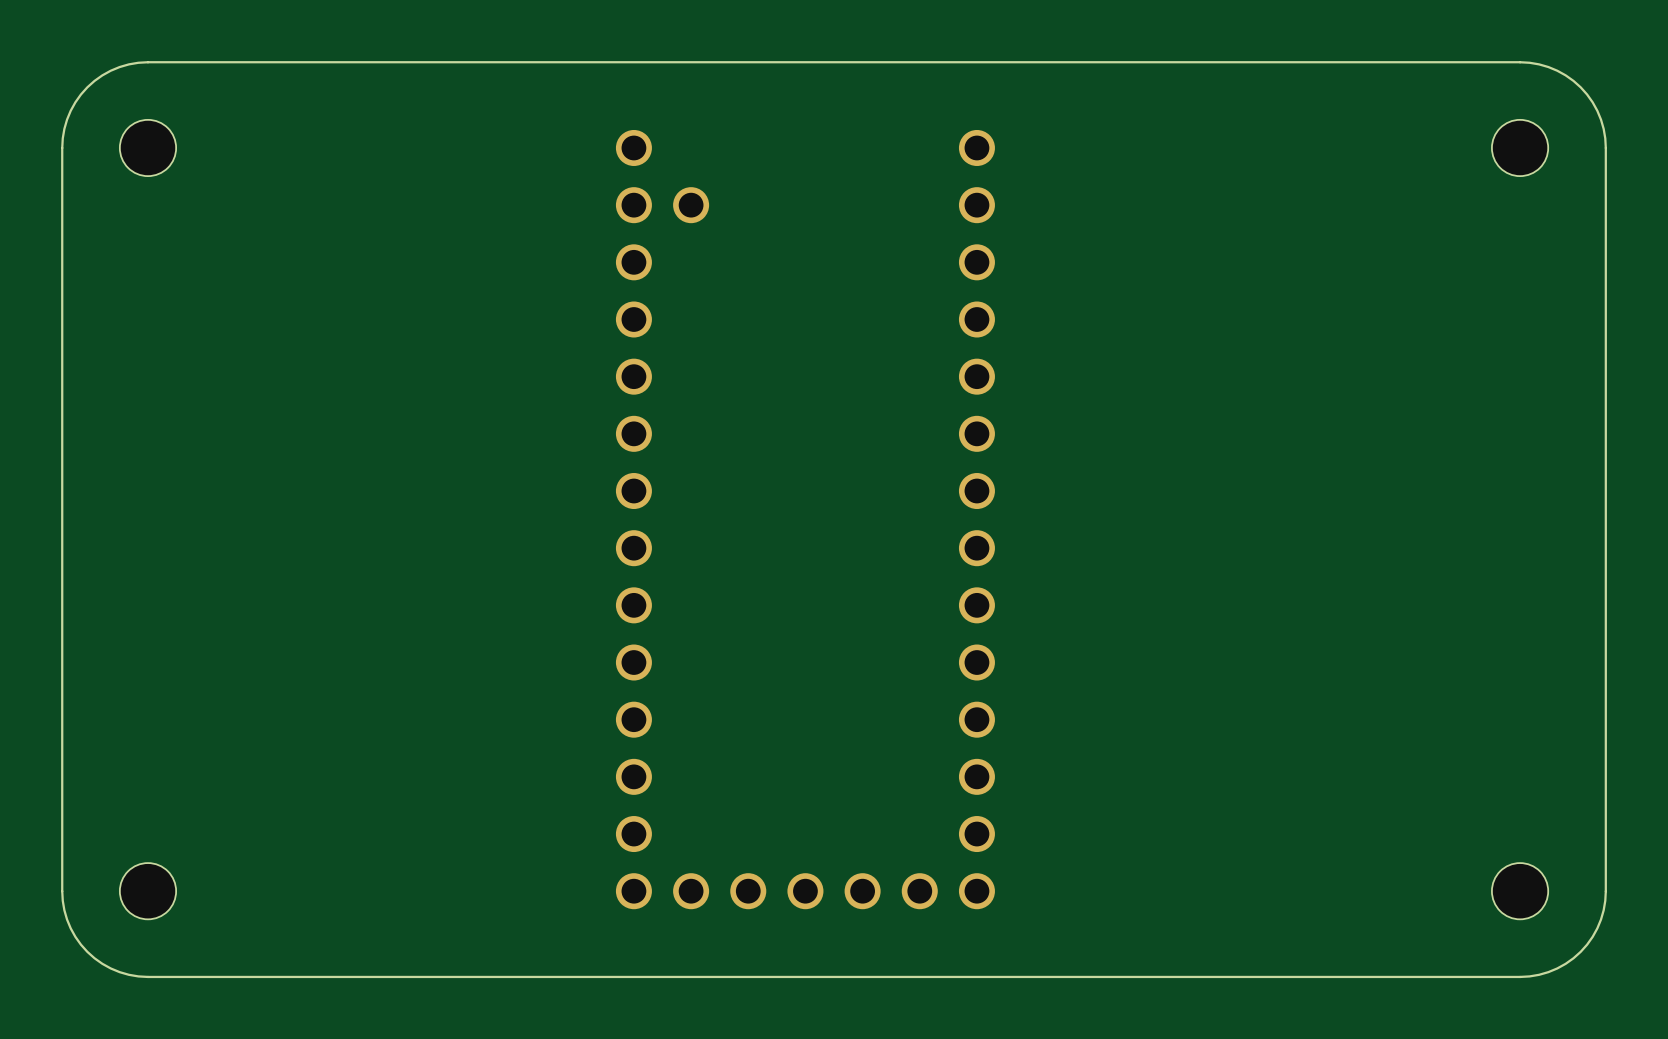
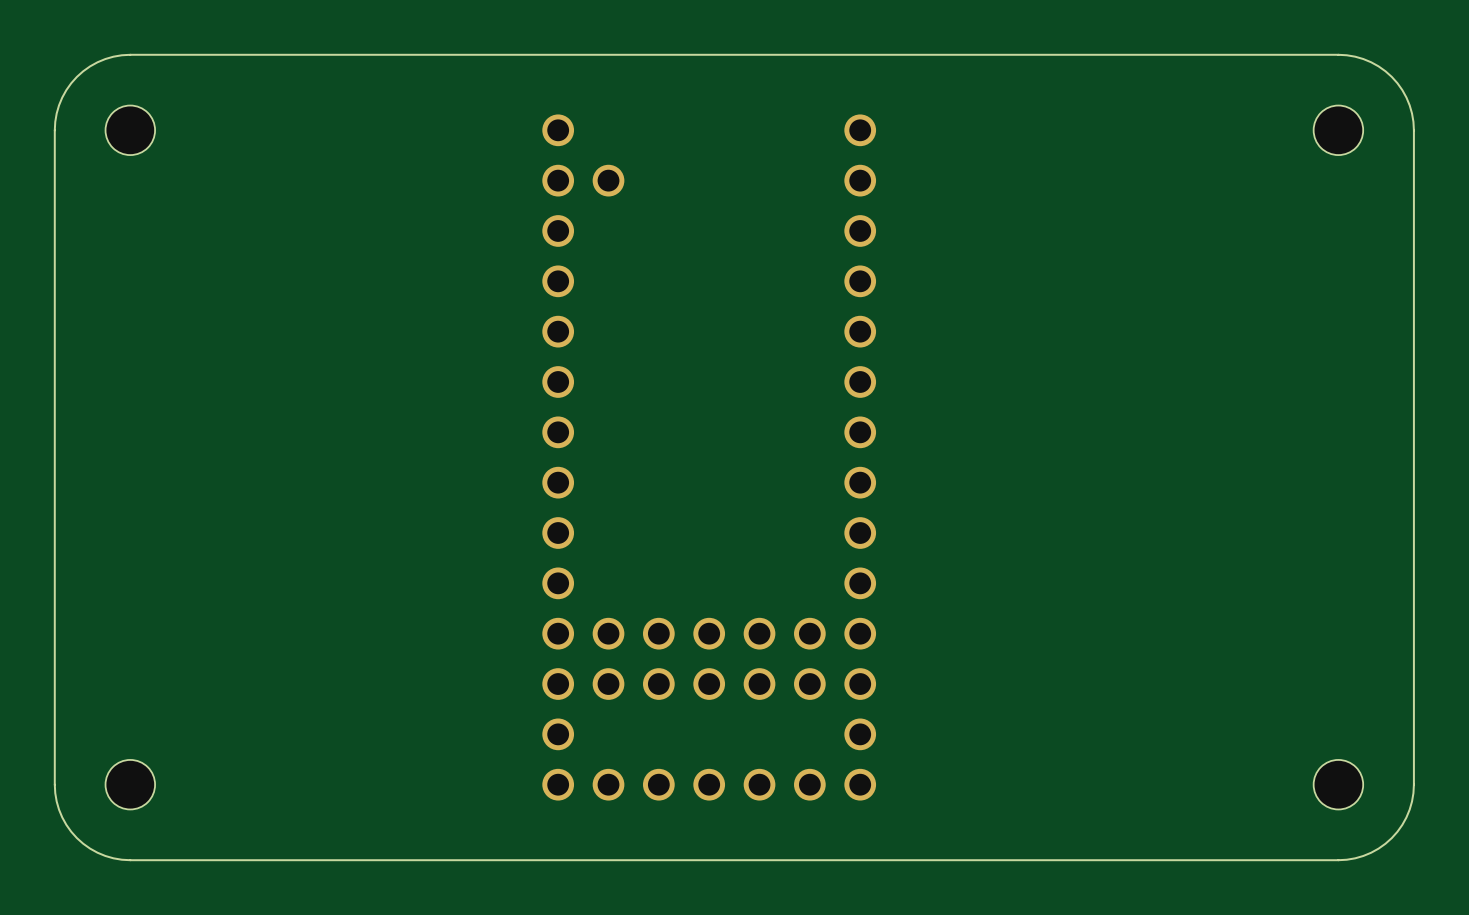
part footprint: [615, 129, 995, 910] -> [542, 114, 877, 801]

